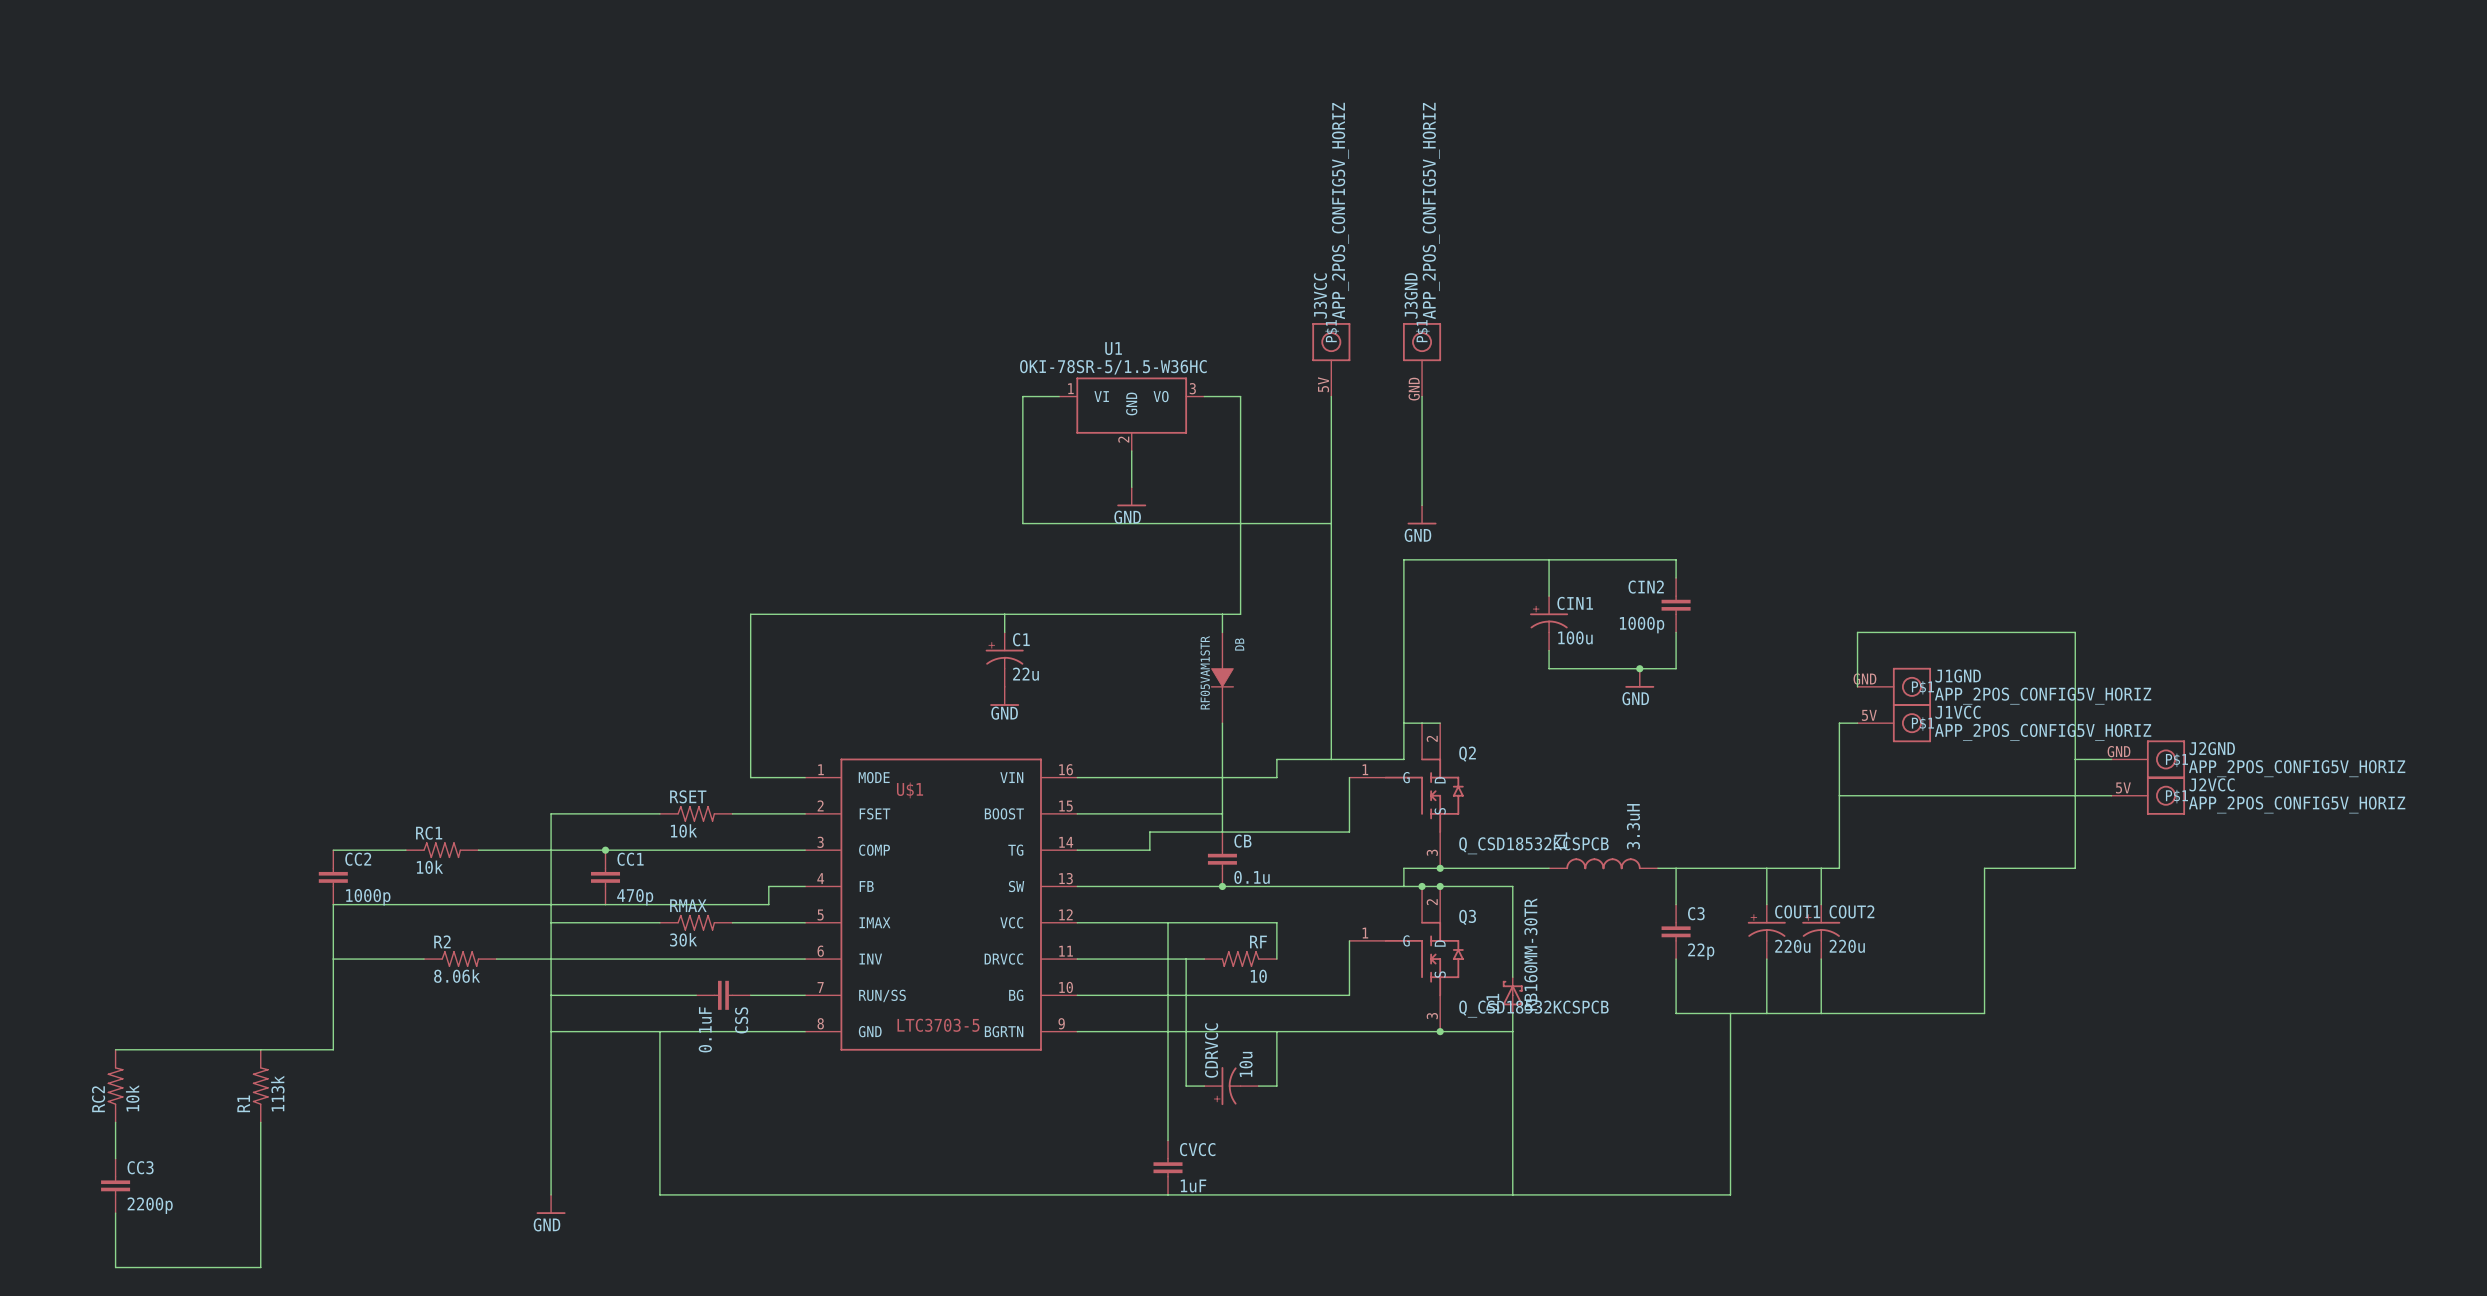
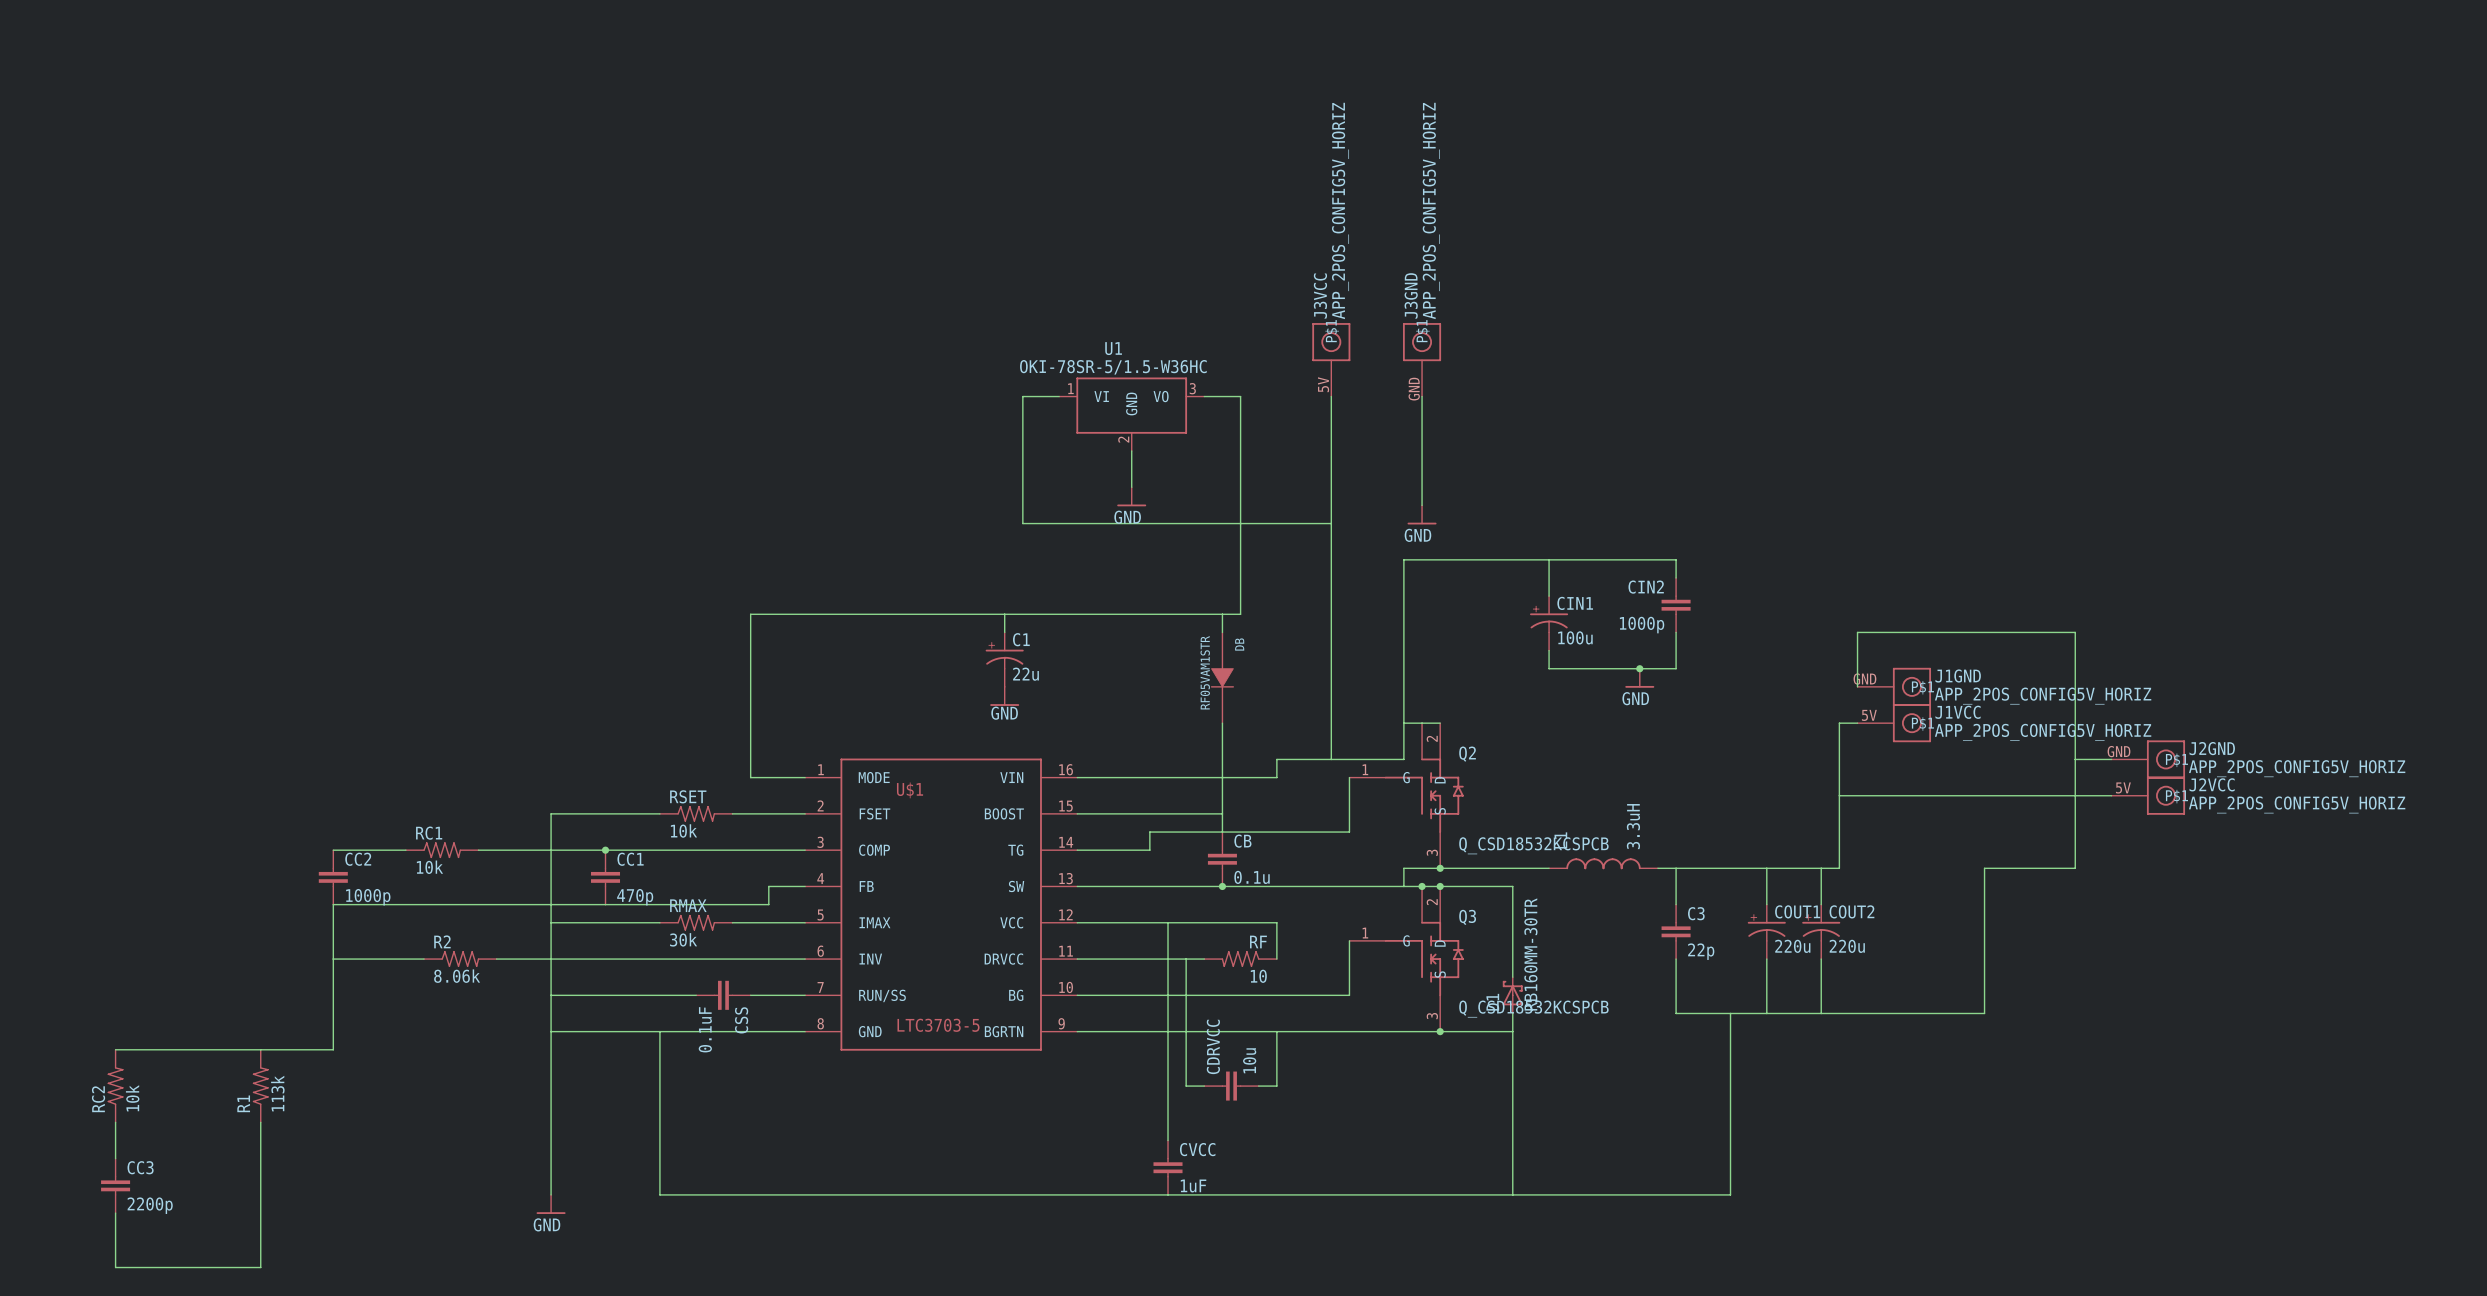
CDRVCC symbol: [1204, 1067, 1259, 1106] -> [1204, 1071, 1259, 1101]

